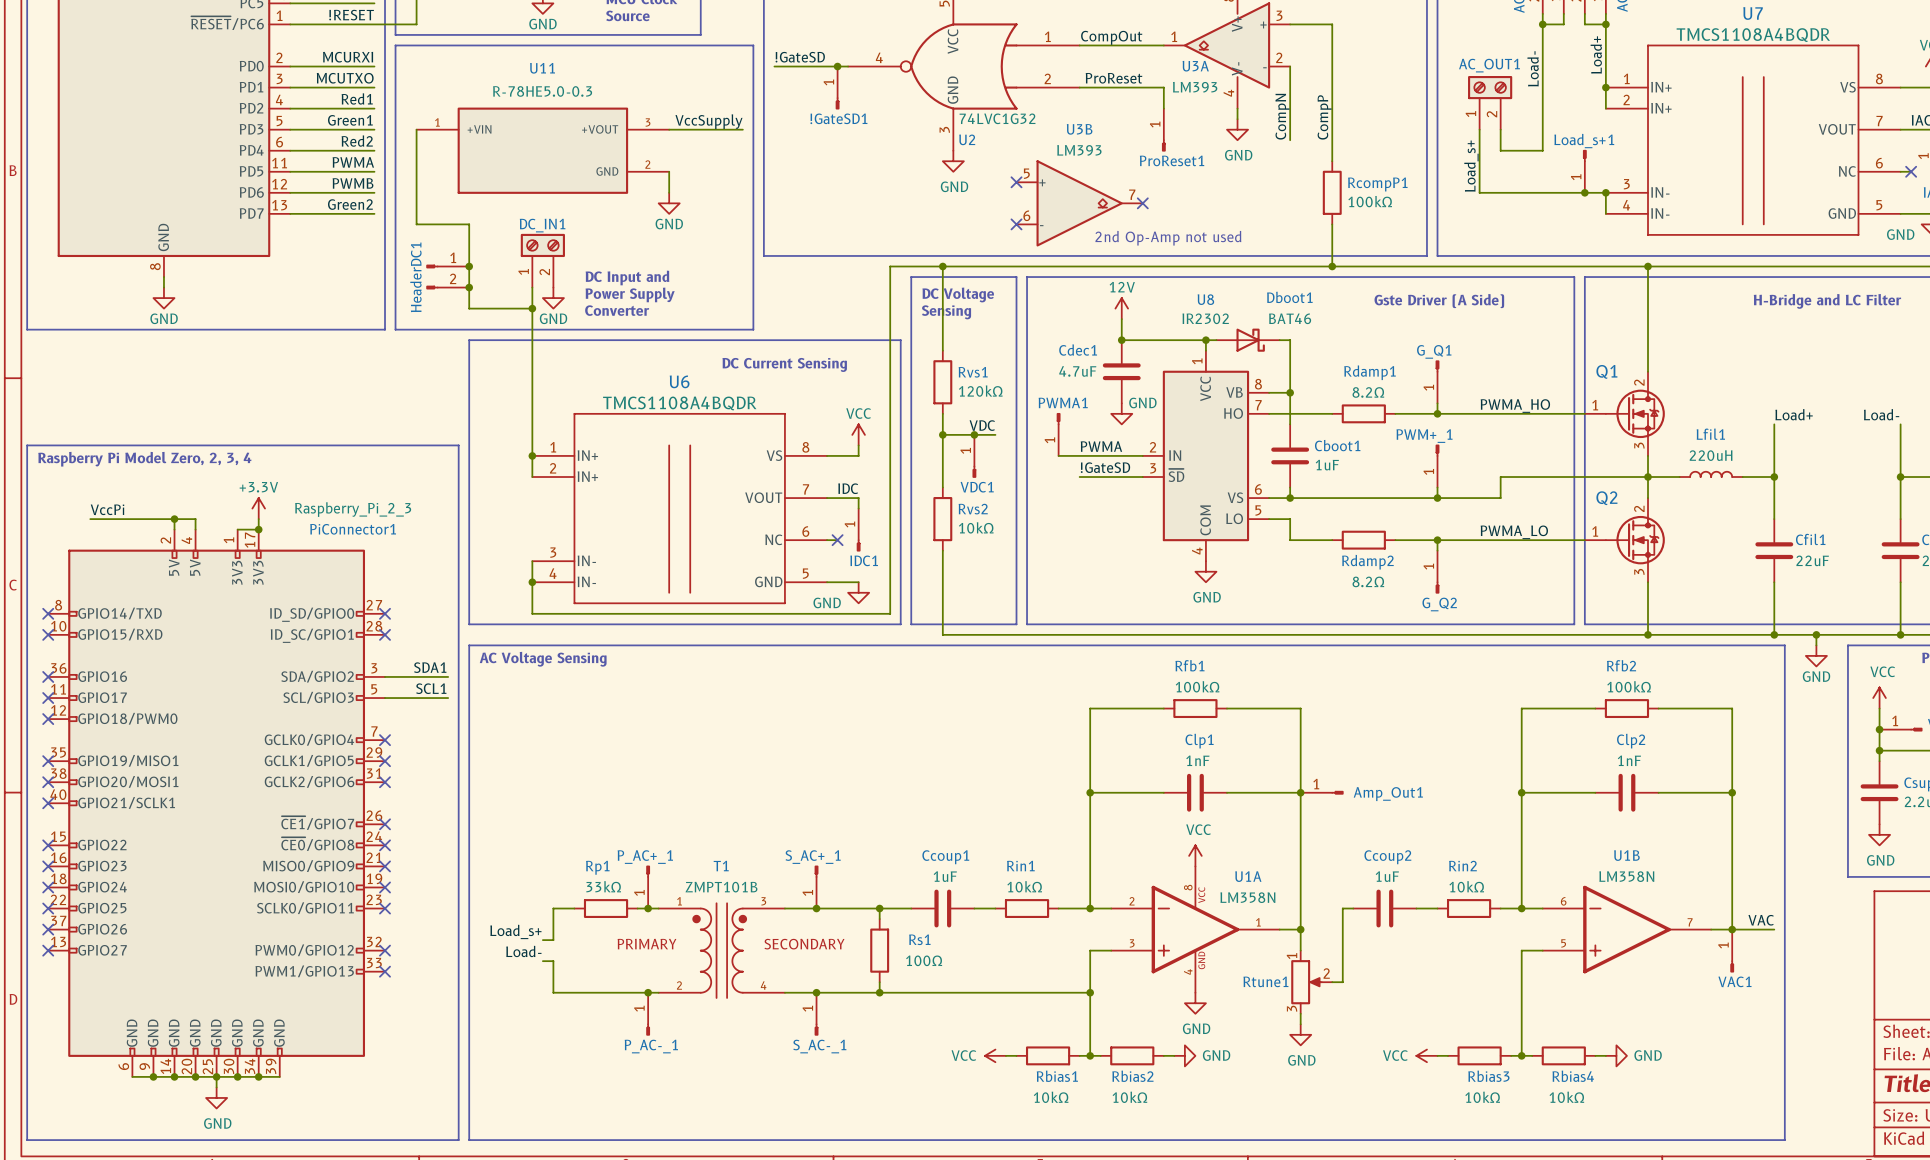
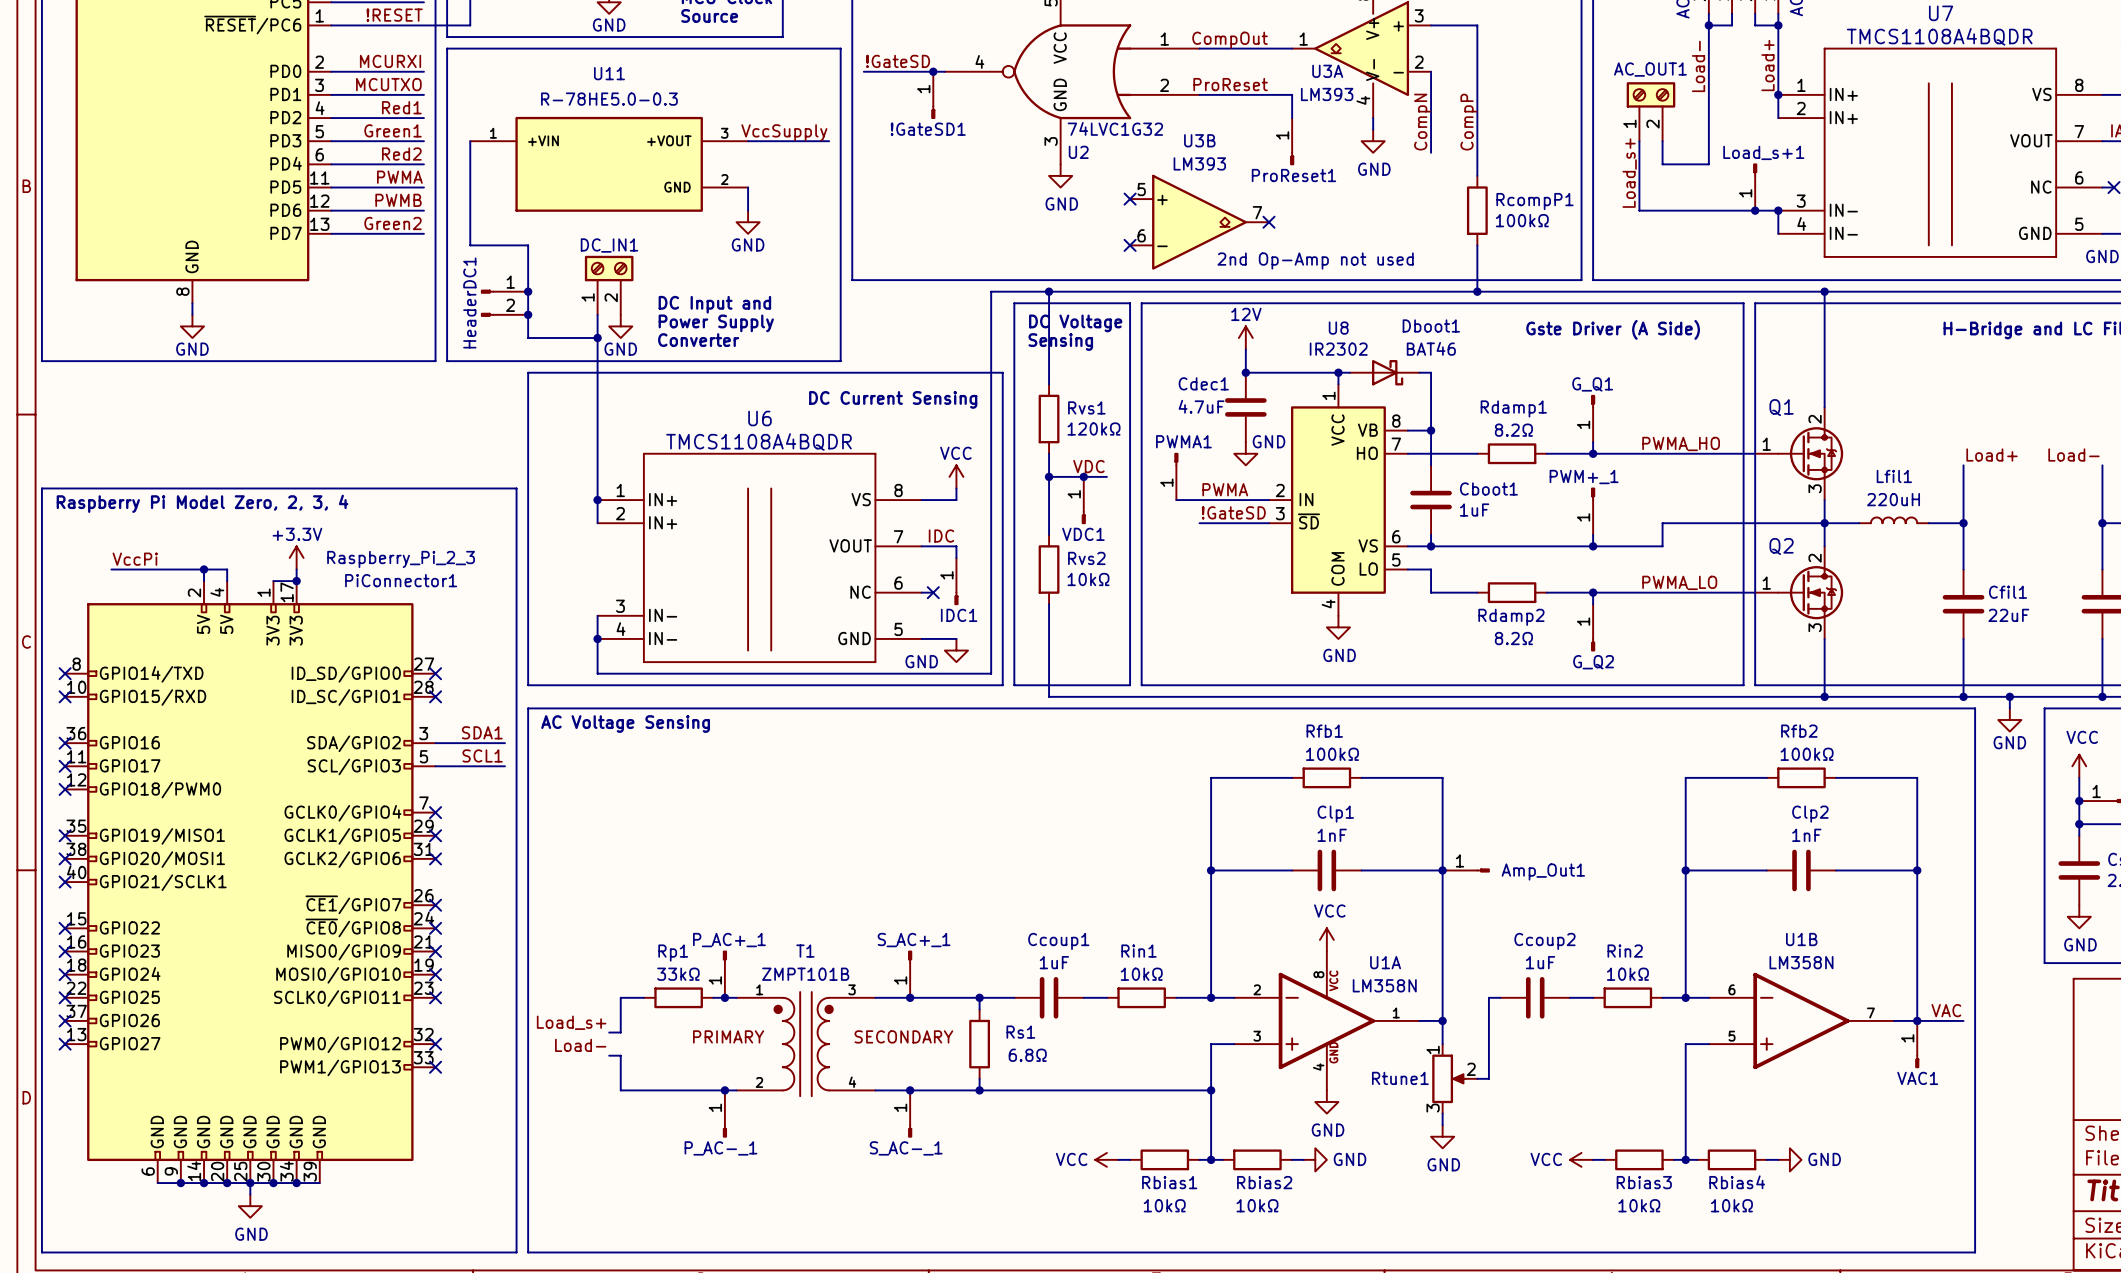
Rs1 value: 100Ω (924, 960) -> 6.8Ω (1027, 1055)

